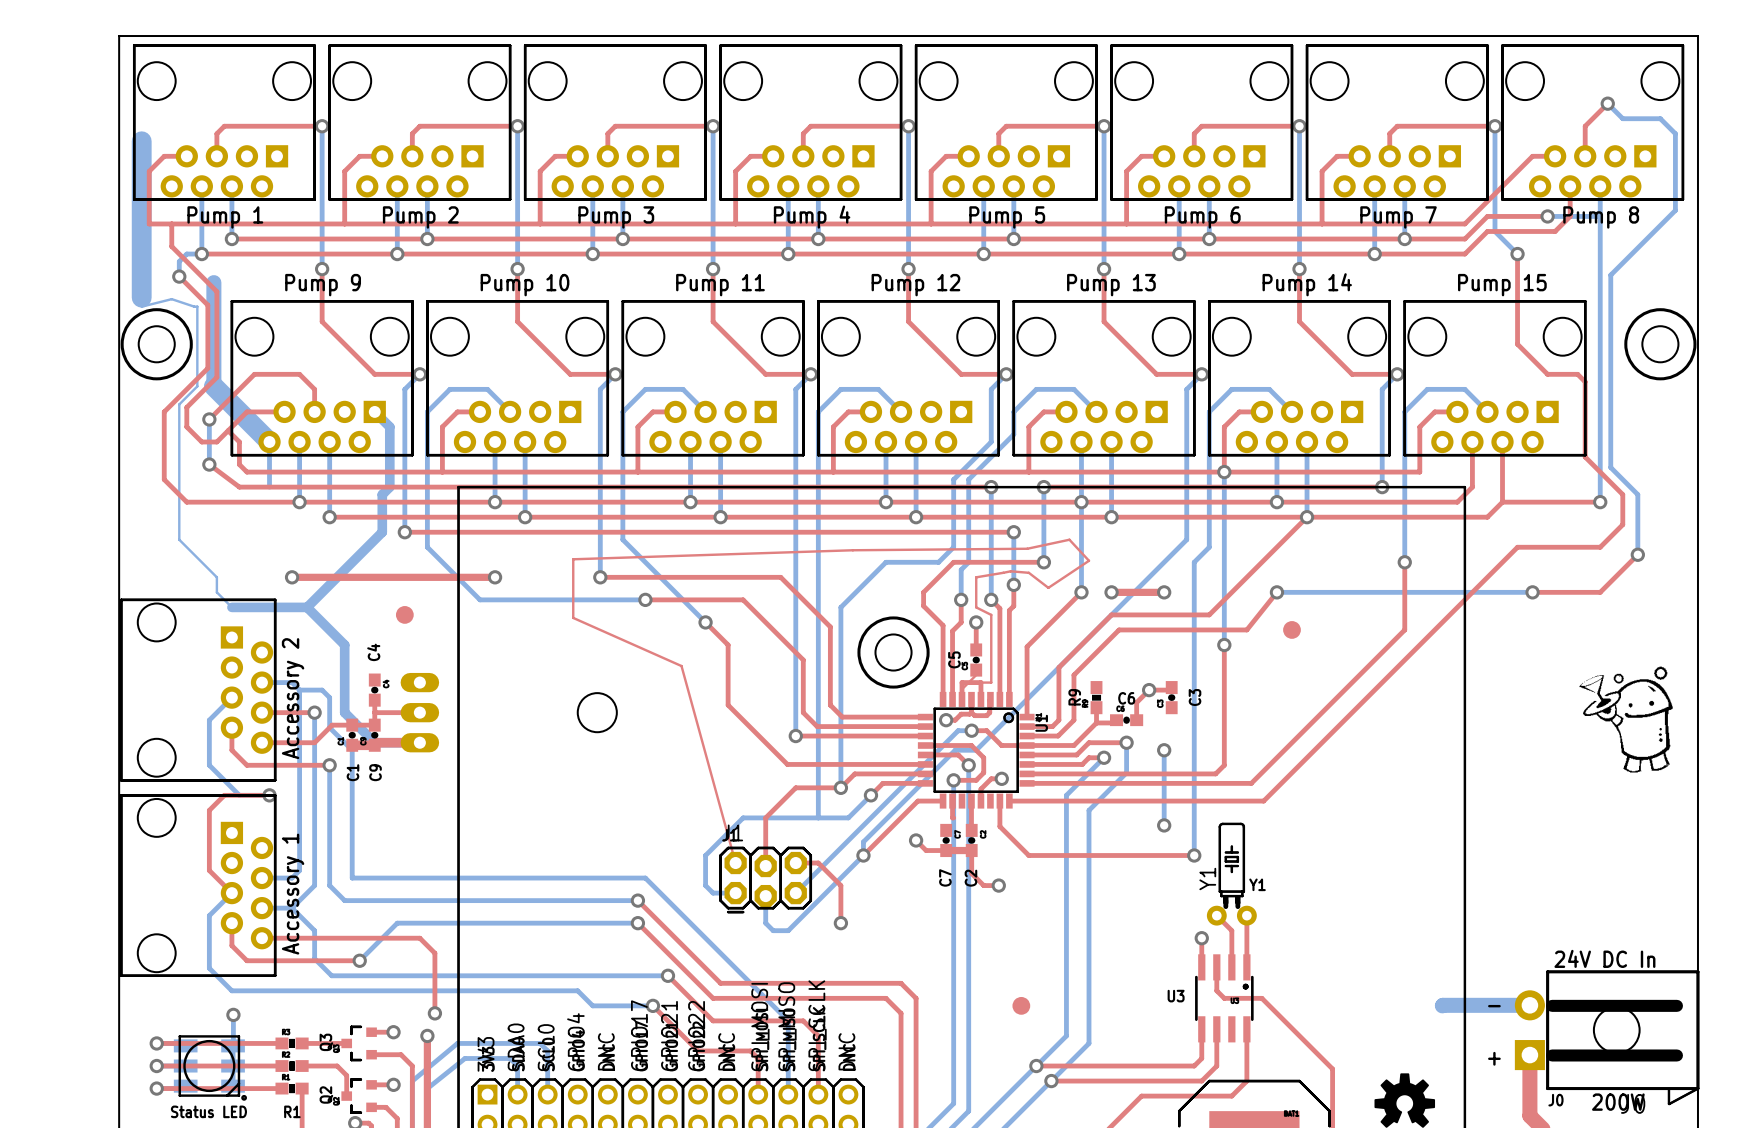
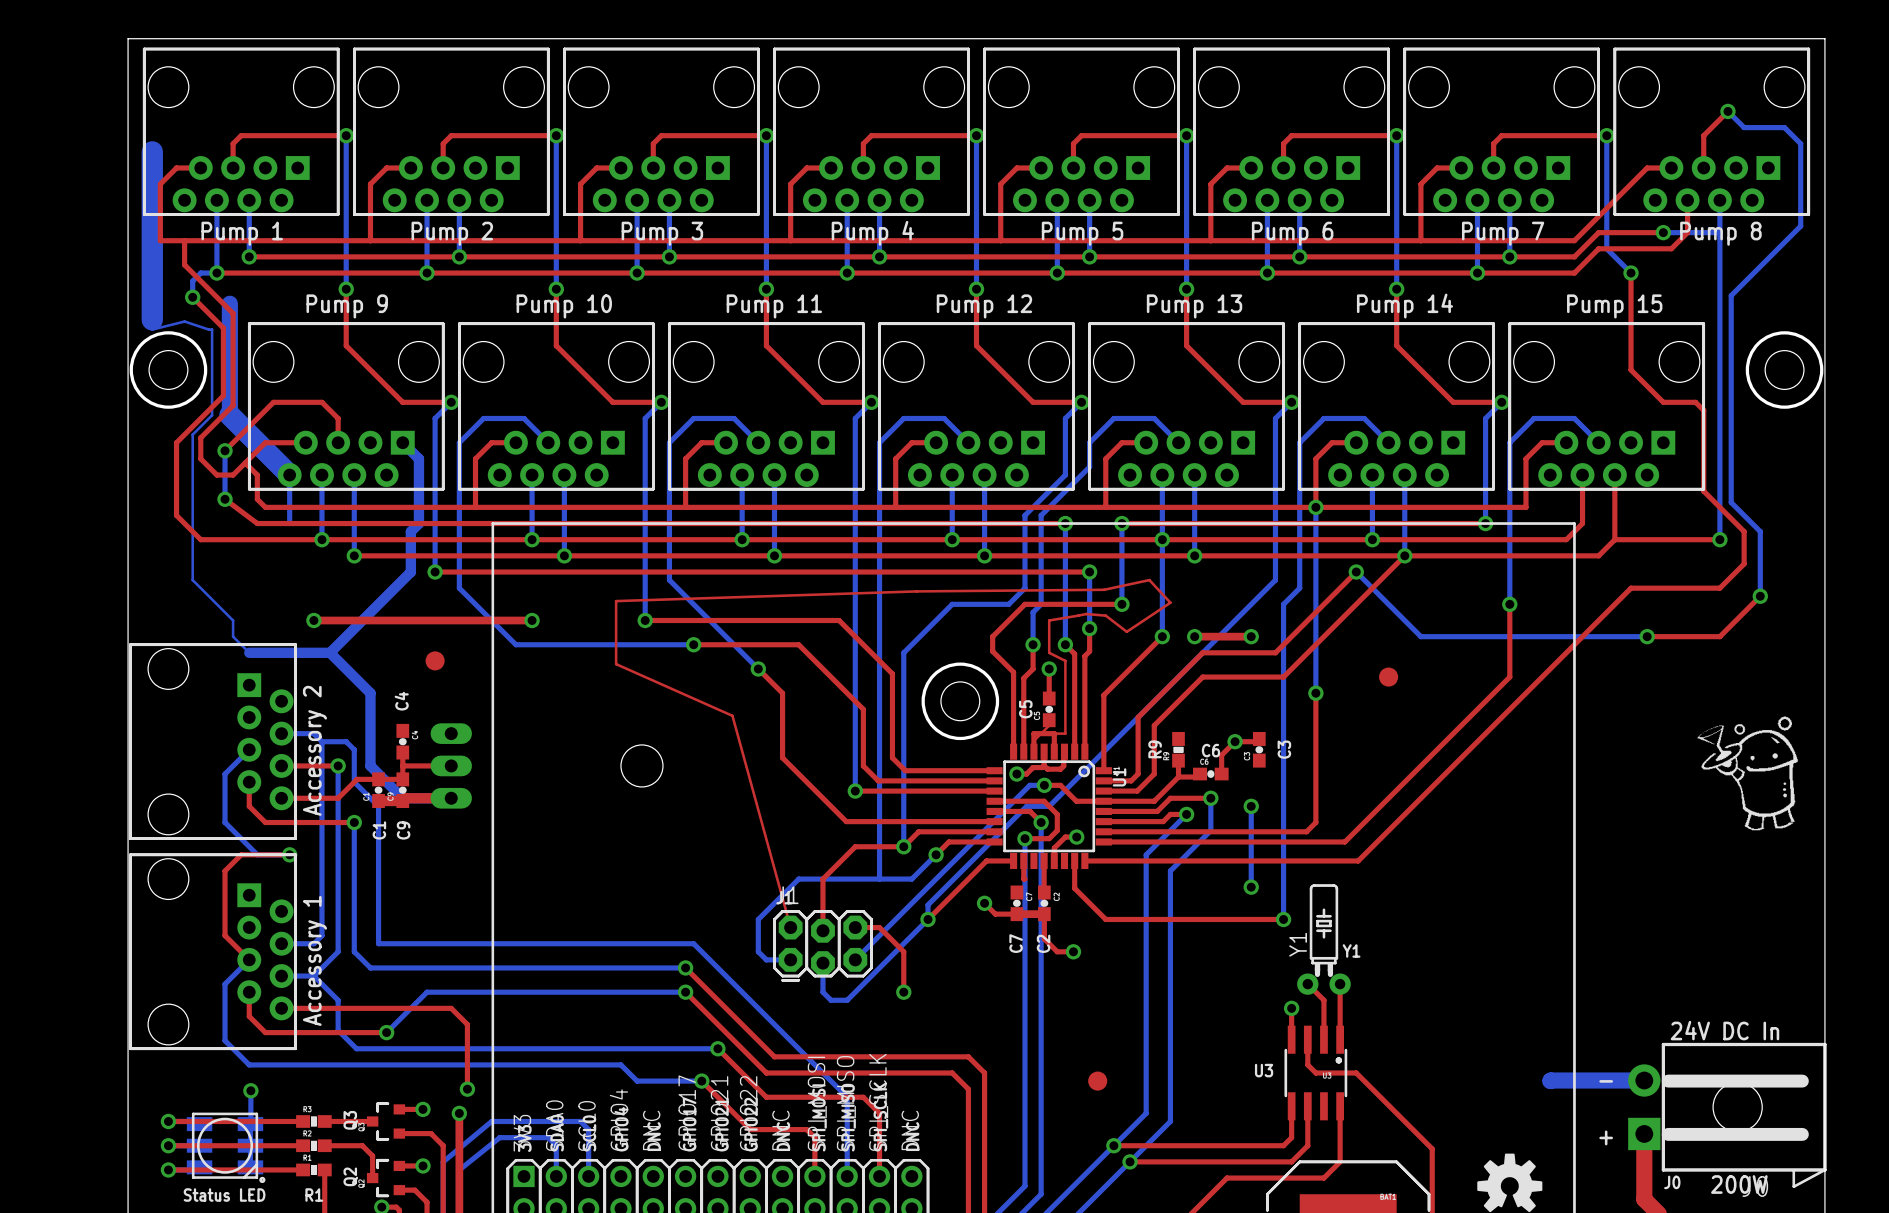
bottom track: (1276, 592) (1322, 592) -> (1356, 572) (1420, 636)
top track: (1276, 592) (1246, 629) (1194, 629) -> (1299, 660) (1283, 677)
via position: (1276, 592) -> (1356, 572)
top track: (1111, 614) (1209, 614) -> (1194, 660) (1202, 652) (1275, 652) (1356, 572)

